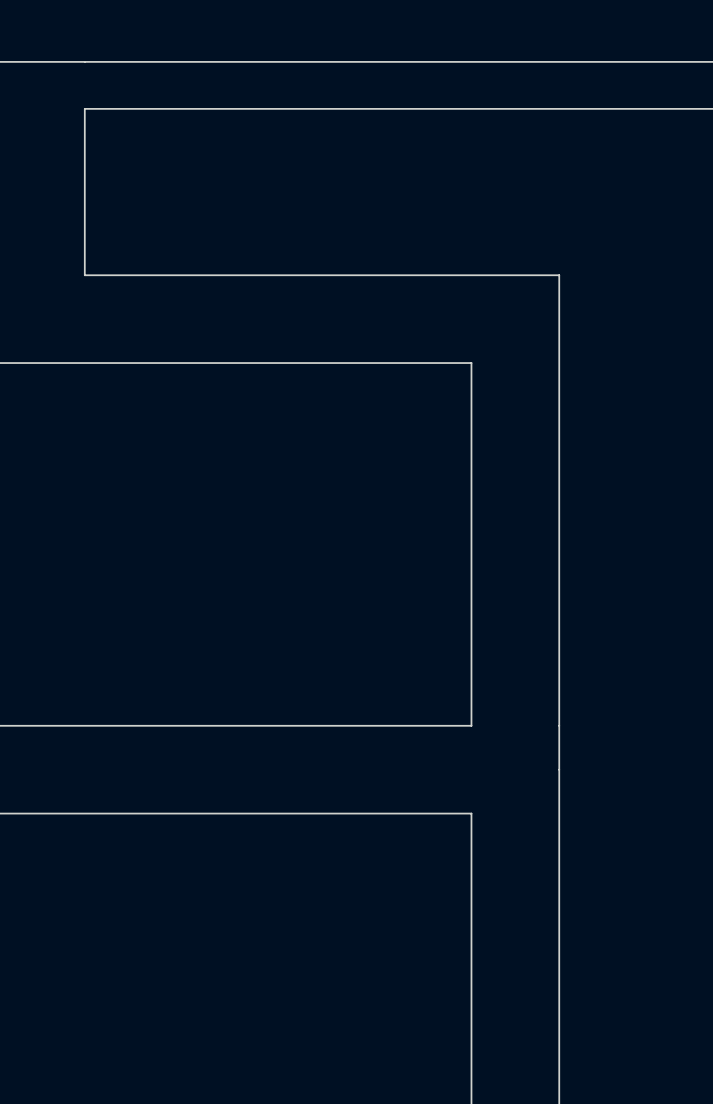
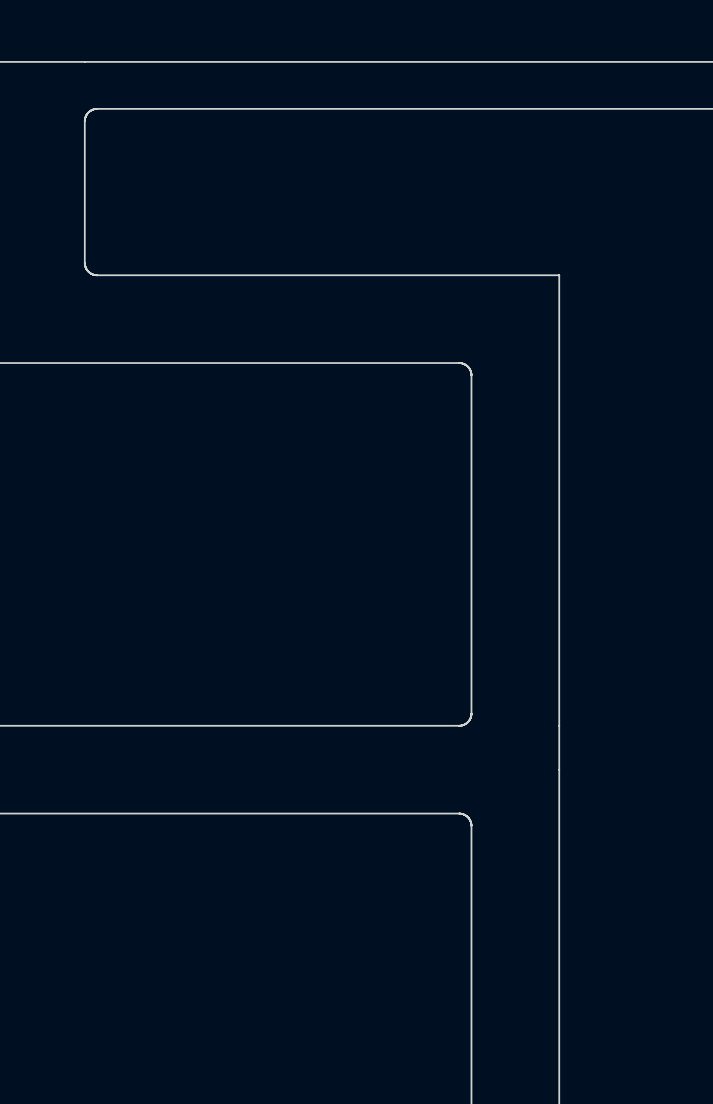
board edge: (97, 108) (84, 108) (84, 121) -> none
board edge: (84, 262) (84, 275) (97, 275) -> none
board edge: (459, 363) (471, 363) (471, 375) -> none
board edge: (471, 713) (471, 725) (459, 725) -> none
board edge: (459, 813) (471, 813) (471, 825) -> none

